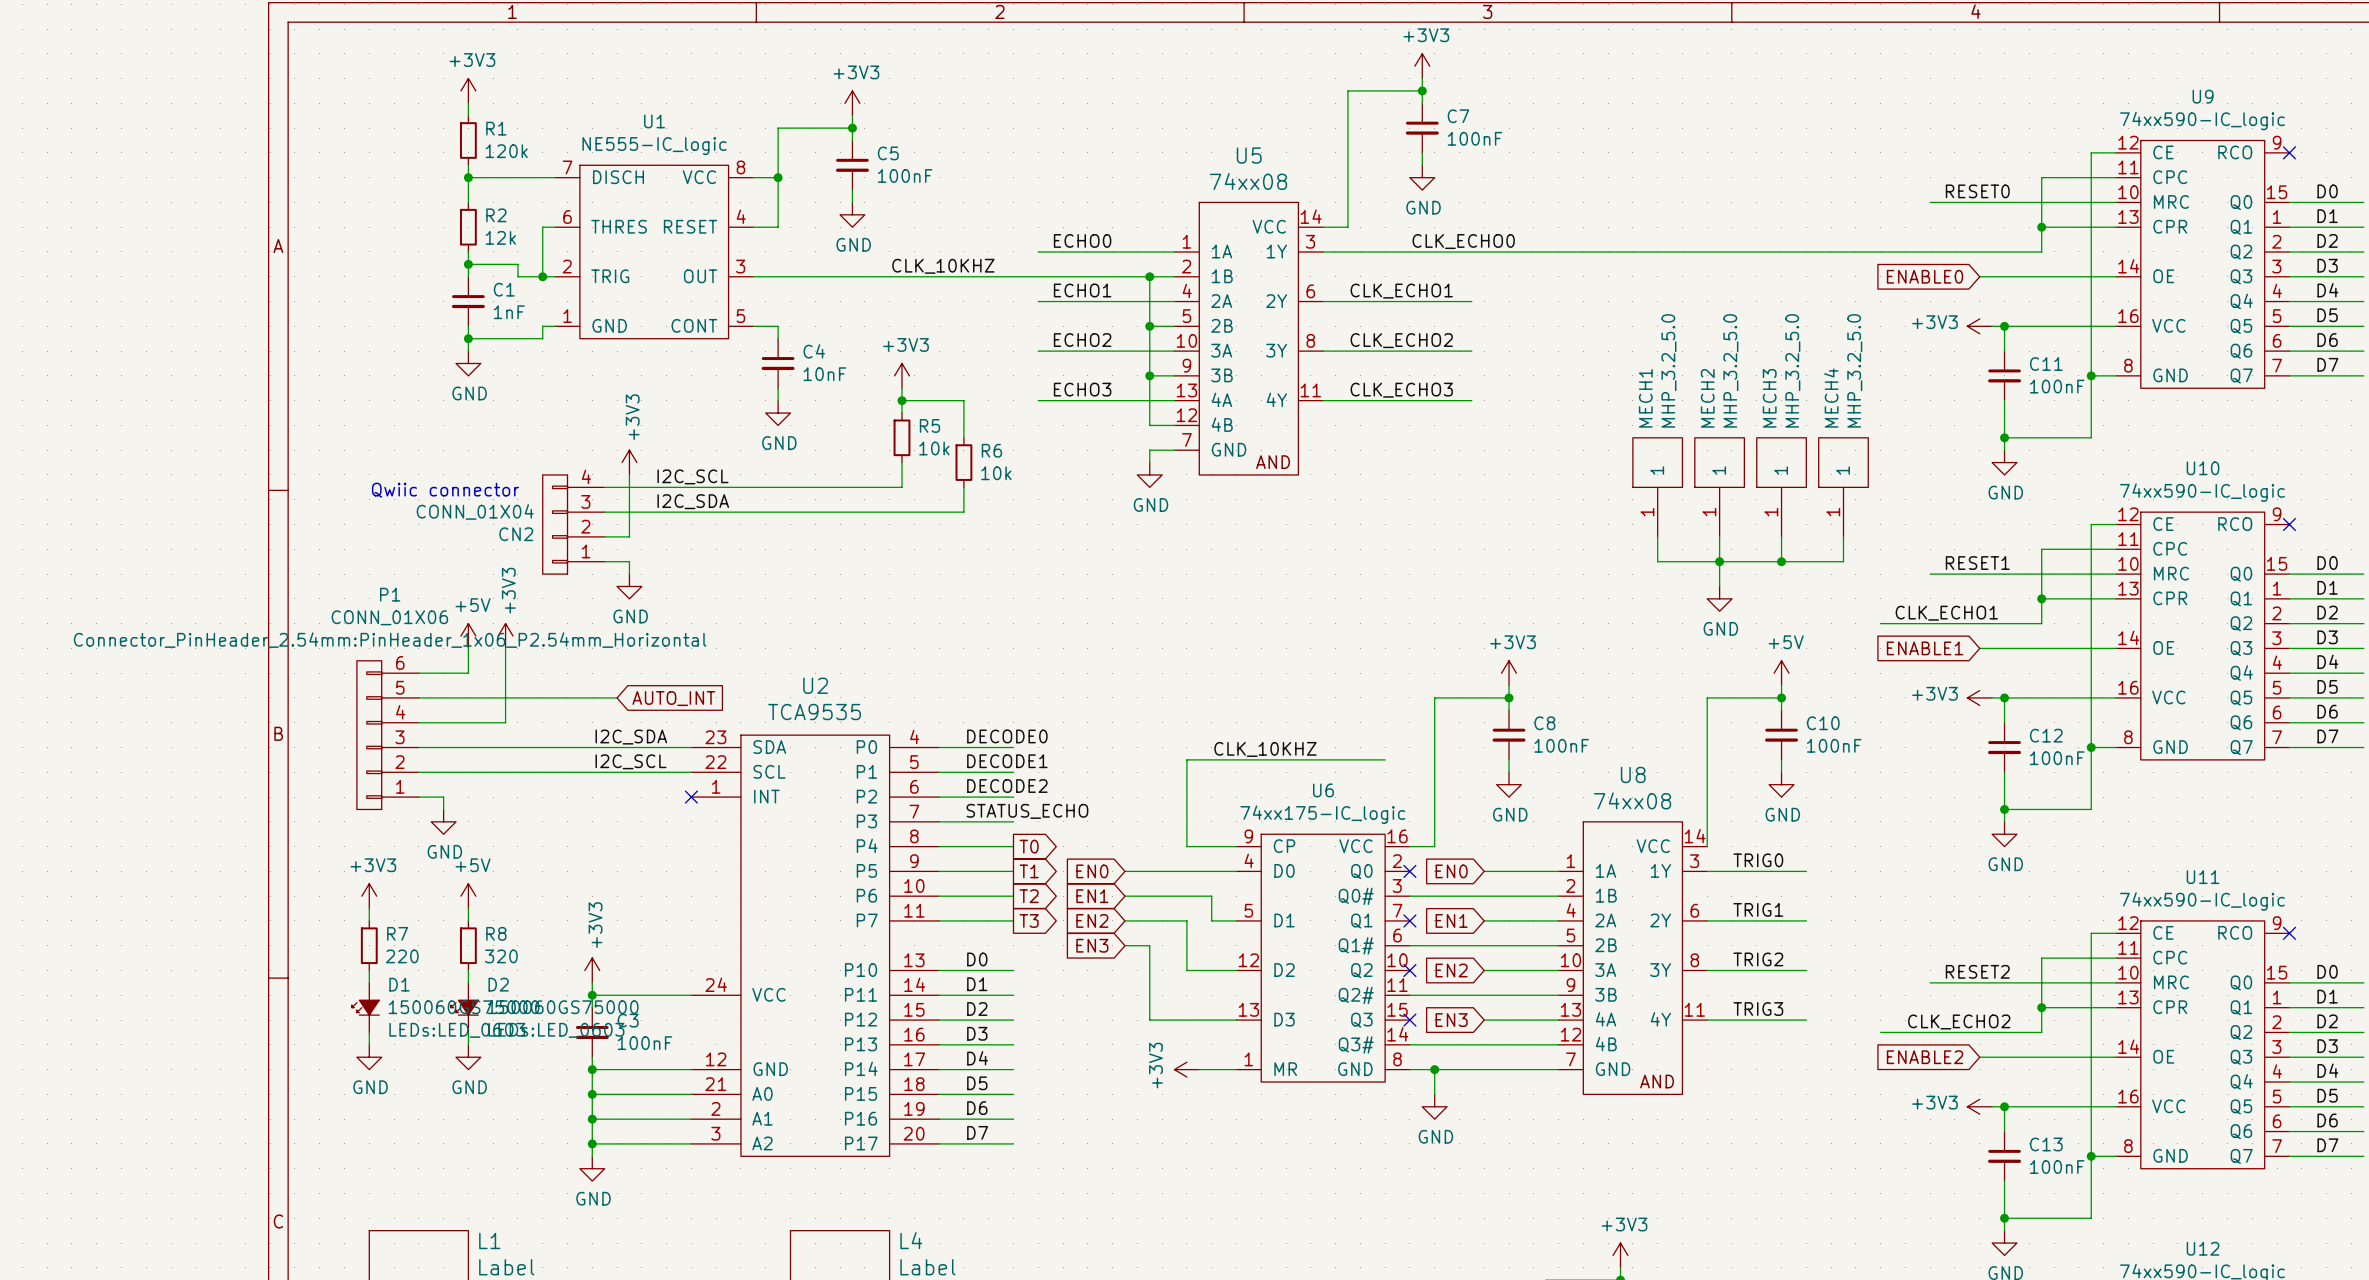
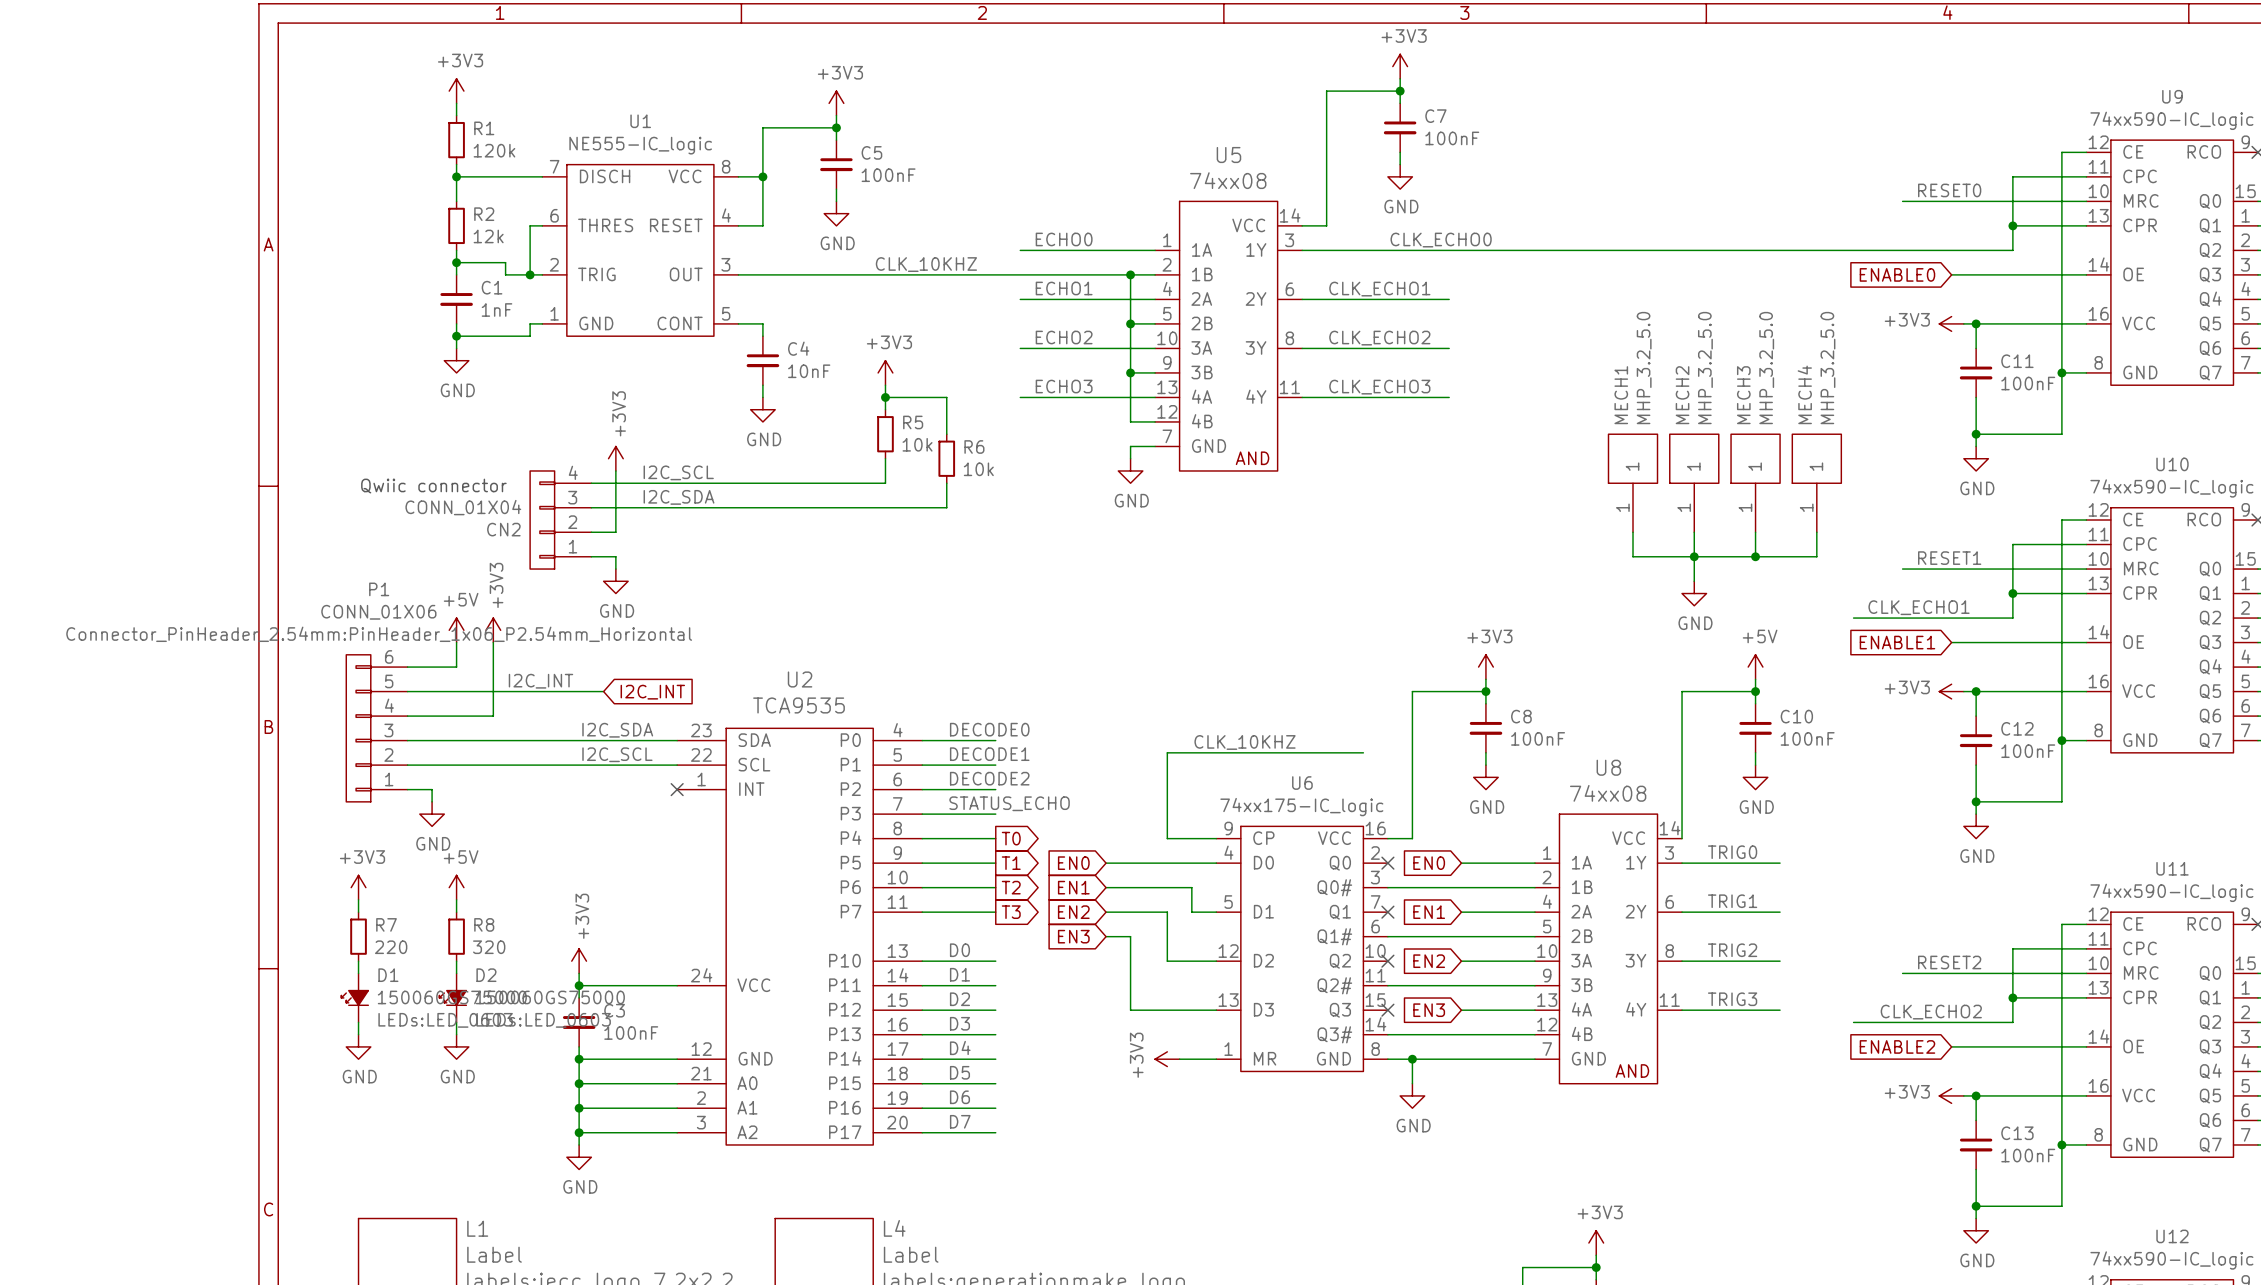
label: none -> I2C_INT (540, 681)
global label: AUTO_INT (673, 698) -> I2C_INT (652, 692)

